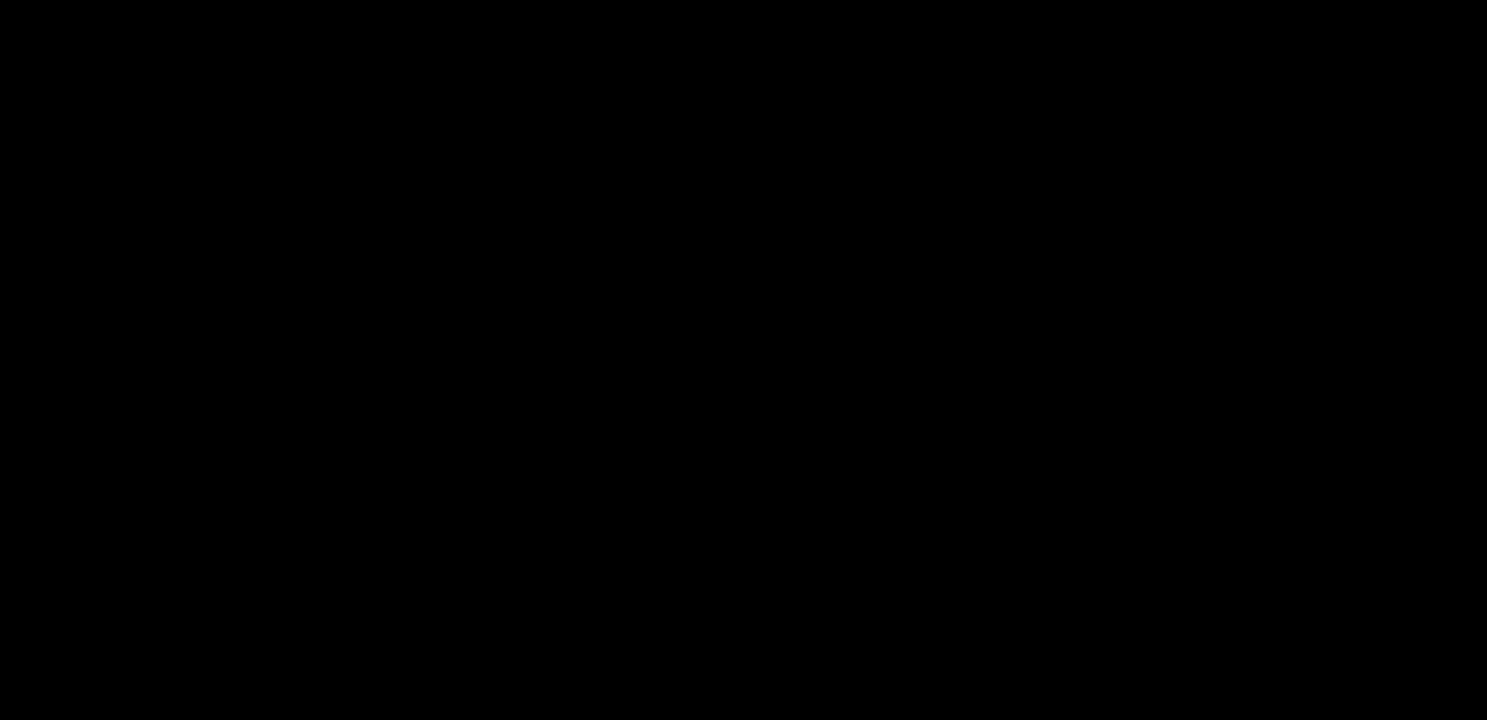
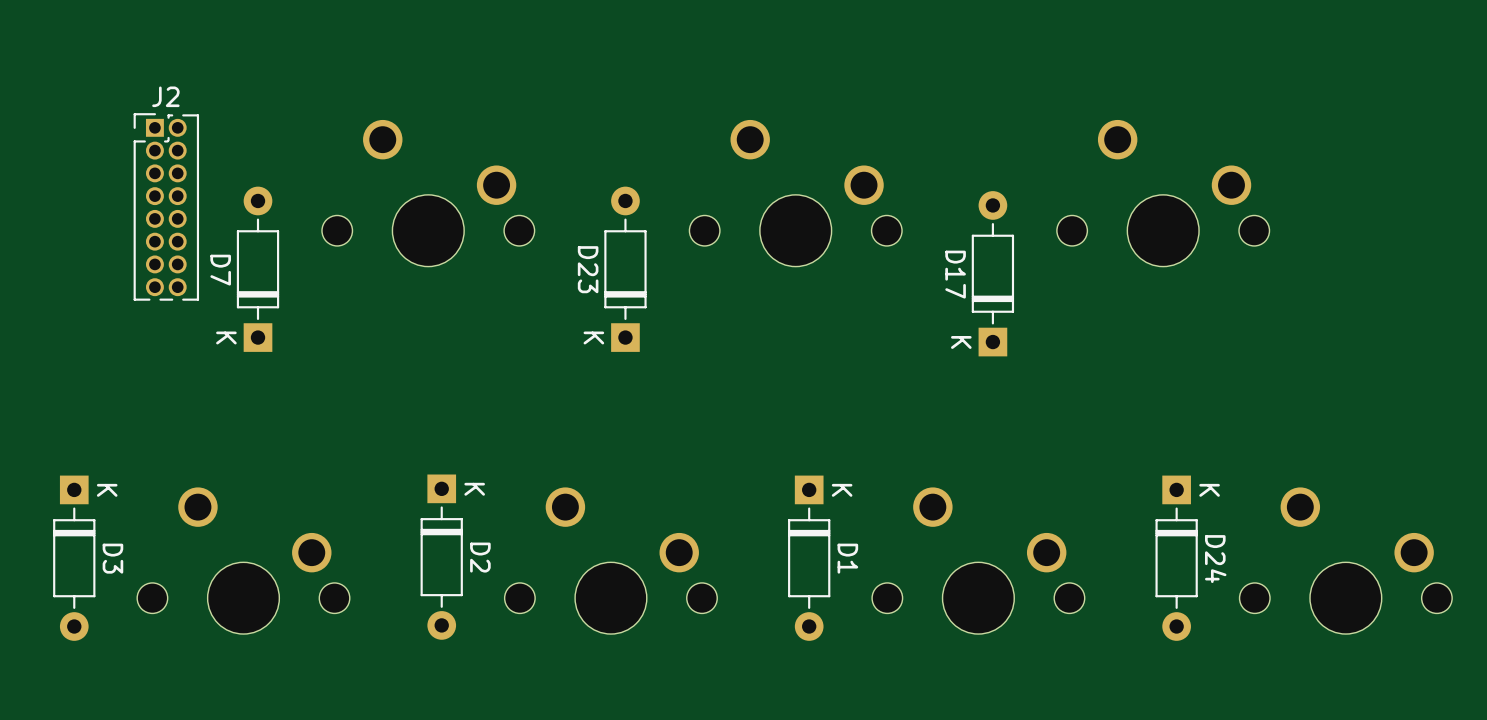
part: none -> (428, 193)
part: none -> (795, 193)
part: none -> (1163, 193)
J2: none -> (166, 206)
D7: none -> (258, 269)
D23: none -> (625, 269)
D17: none -> (992, 273)
D2: none -> (441, 557)
D3: none -> (74, 558)
D1: none -> (809, 558)
D24: none -> (1176, 558)
part: none -> (243, 560)
part: none -> (610, 560)
part: none -> (978, 560)
part: none -> (1345, 560)

